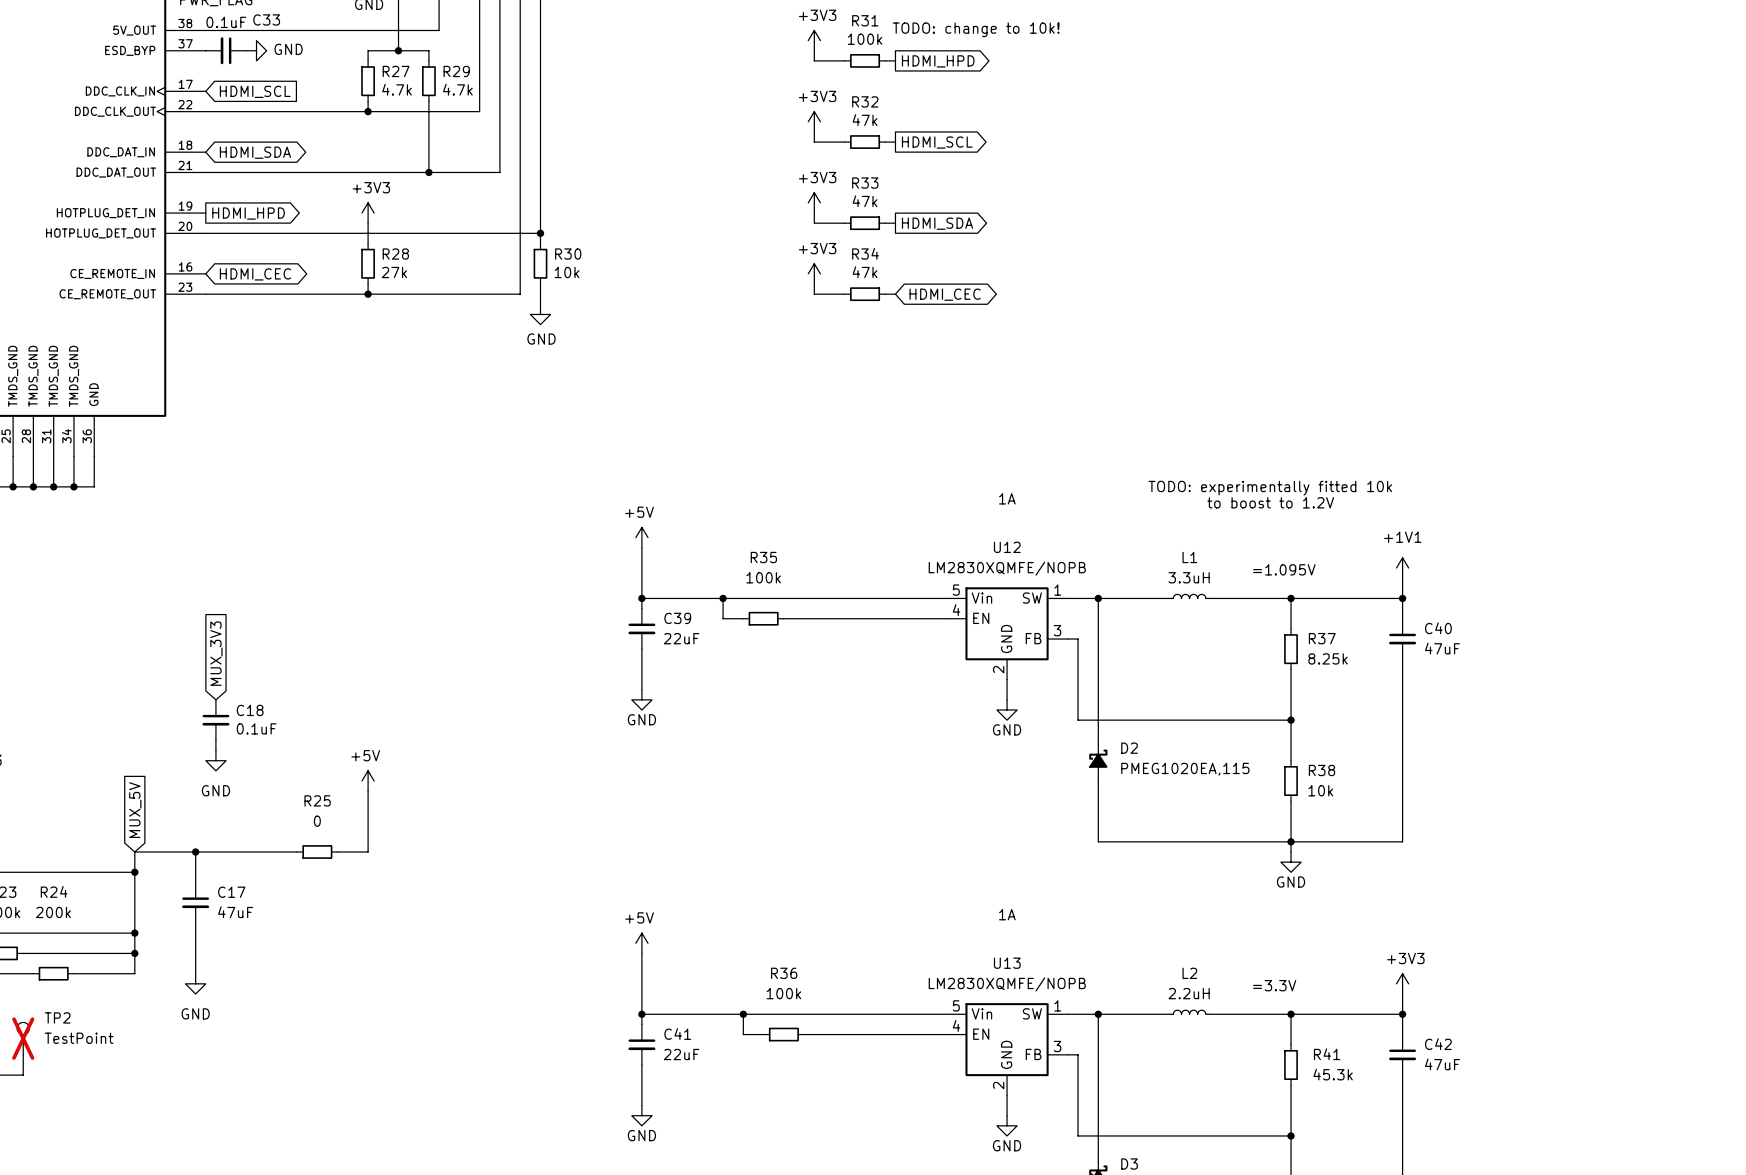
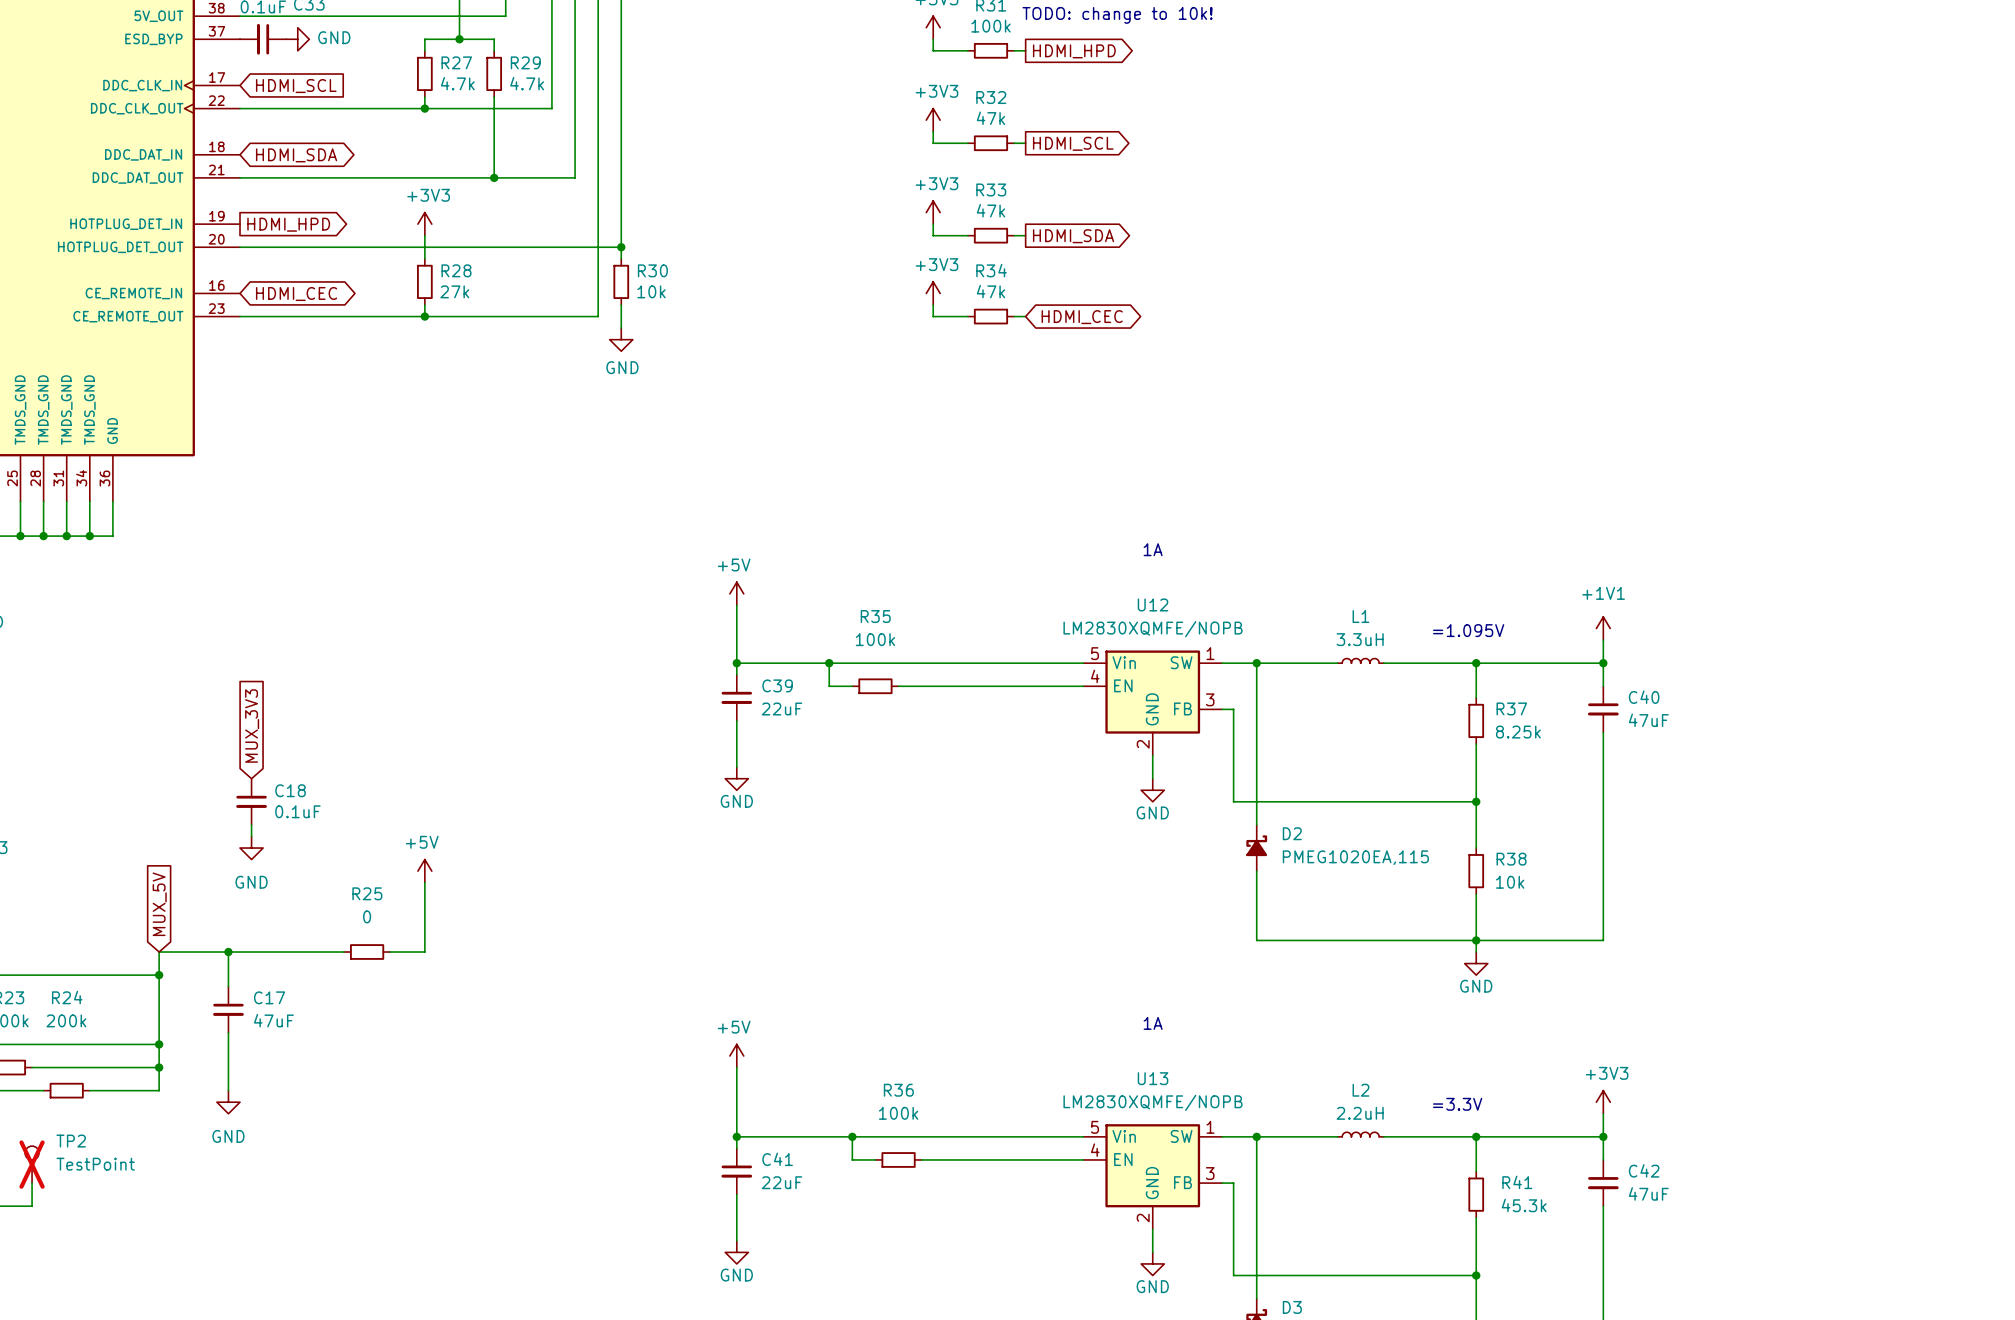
text: TODO: experimentally fitted 10k (1270, 488) -> none
text: to boost to 1.2V (1270, 502) -> none

